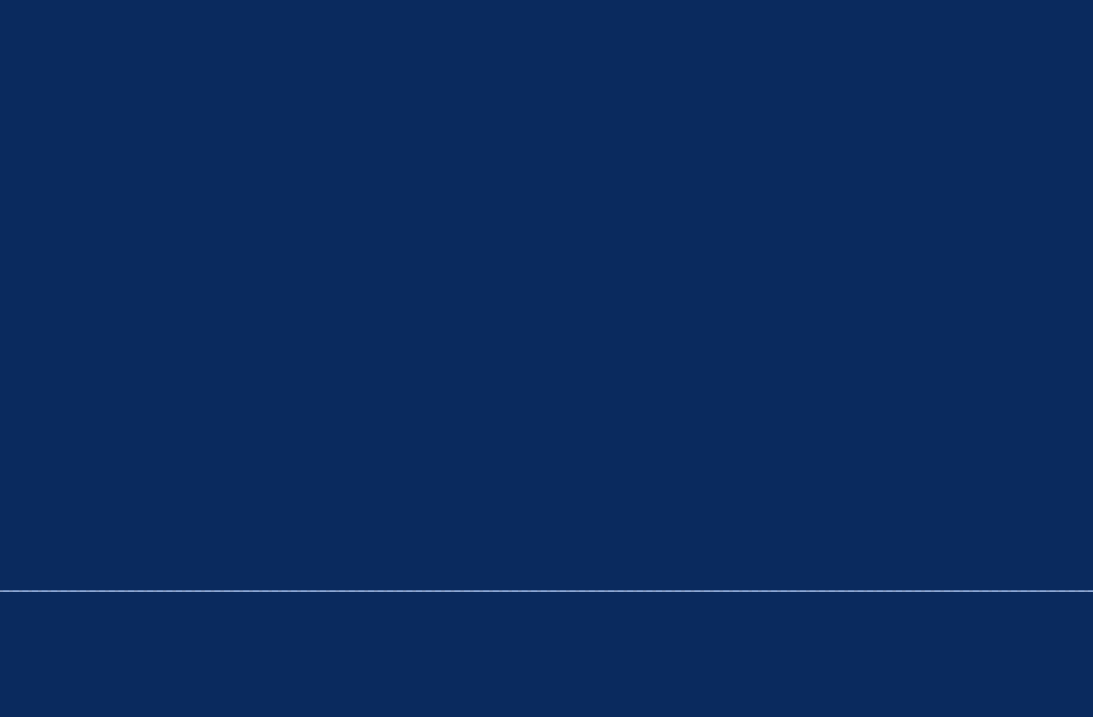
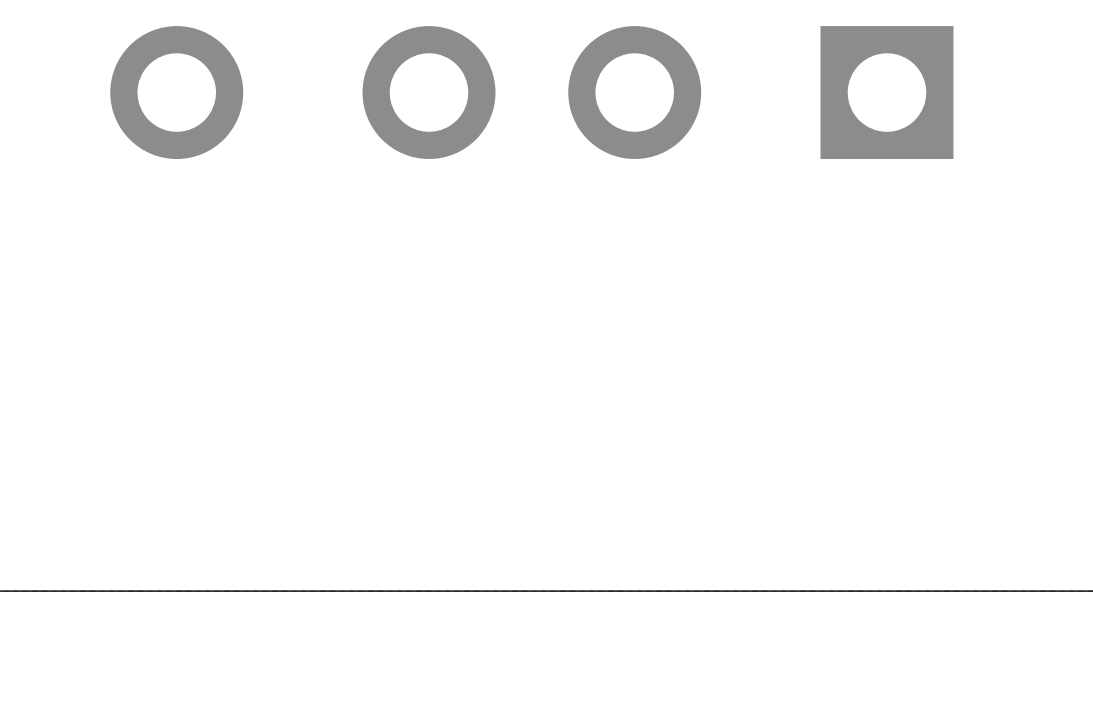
part: none -> (531, 92)

